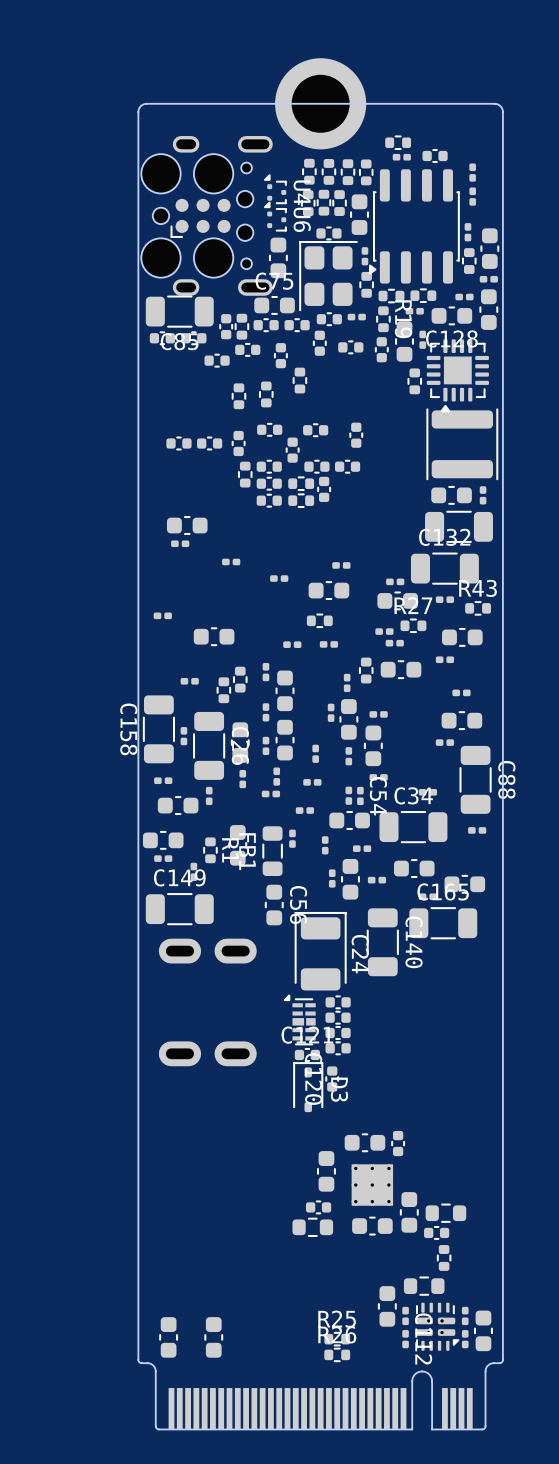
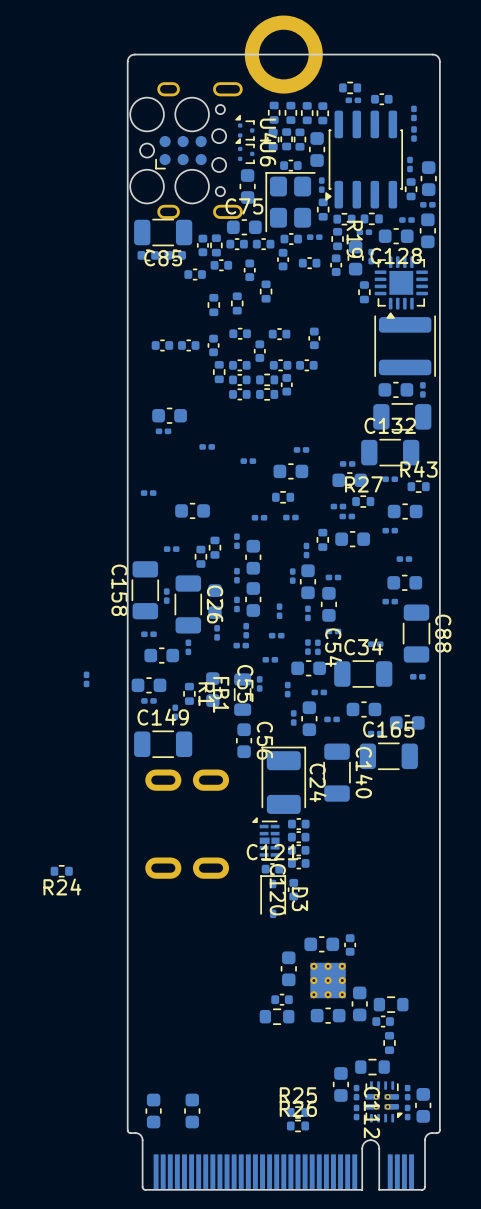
part: none -> (86, 679)
C55 name: none -> C55 (245, 683)
R24: none -> (61, 871)

